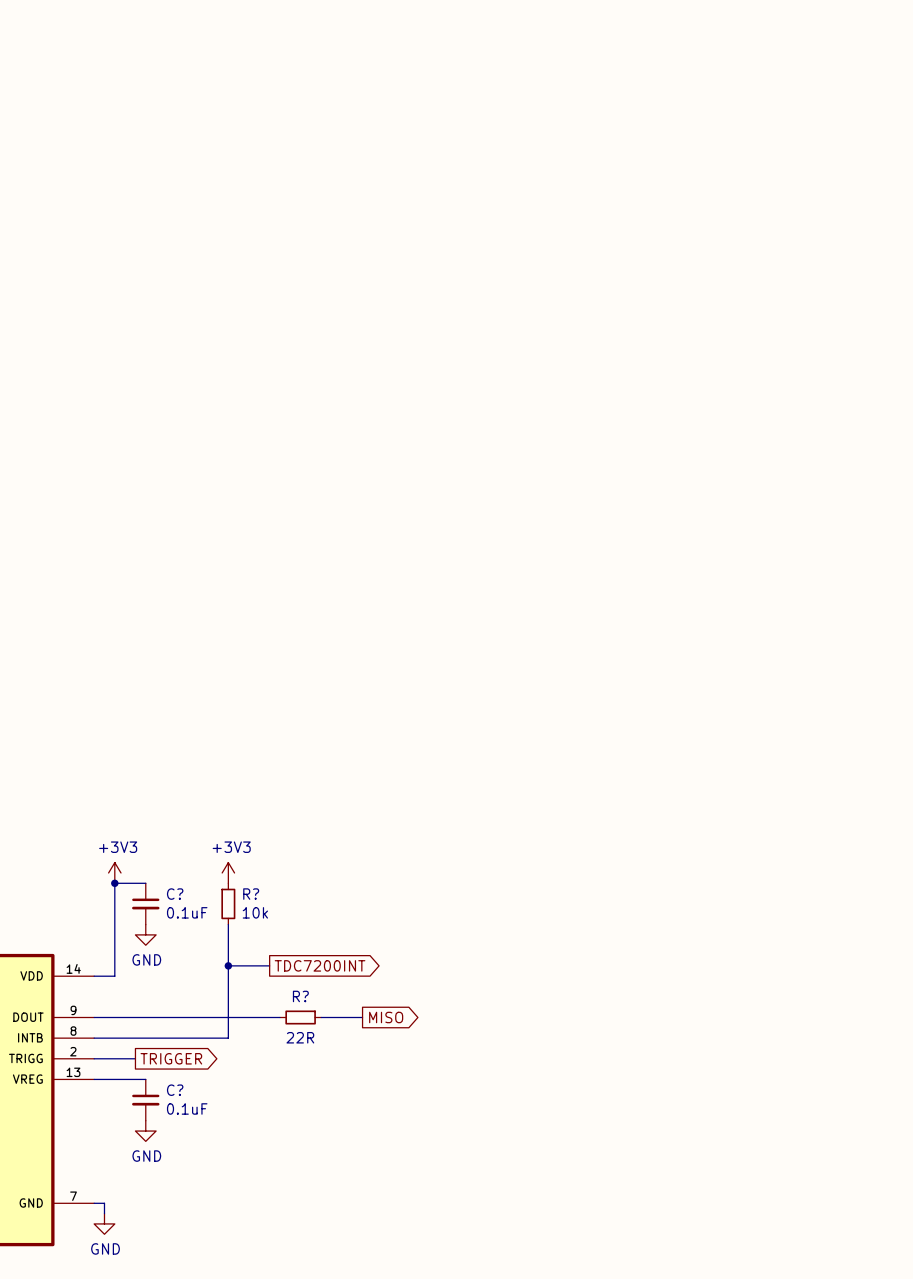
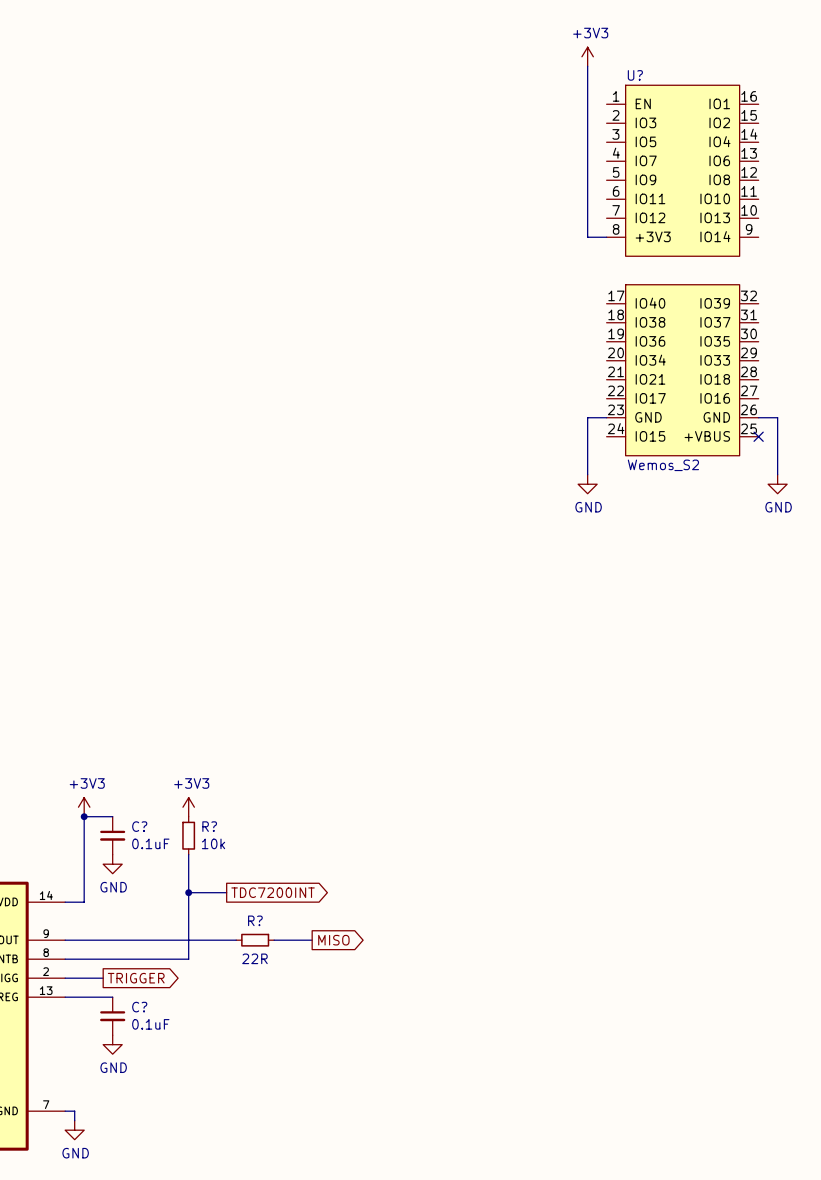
power symbol: none -> +3V3 (587, 56)
wire: none -> (587, 66) (587, 237) (606, 237)
U?: none -> Wemos_S2 (682, 270)
wire: none -> (606, 417) (587, 417) (587, 474)
wire: none -> (758, 417) (777, 417) (777, 474)
no-connect mark: none -> (758, 436)
power symbol: none -> GND (587, 484)
power symbol: none -> GND (777, 484)

